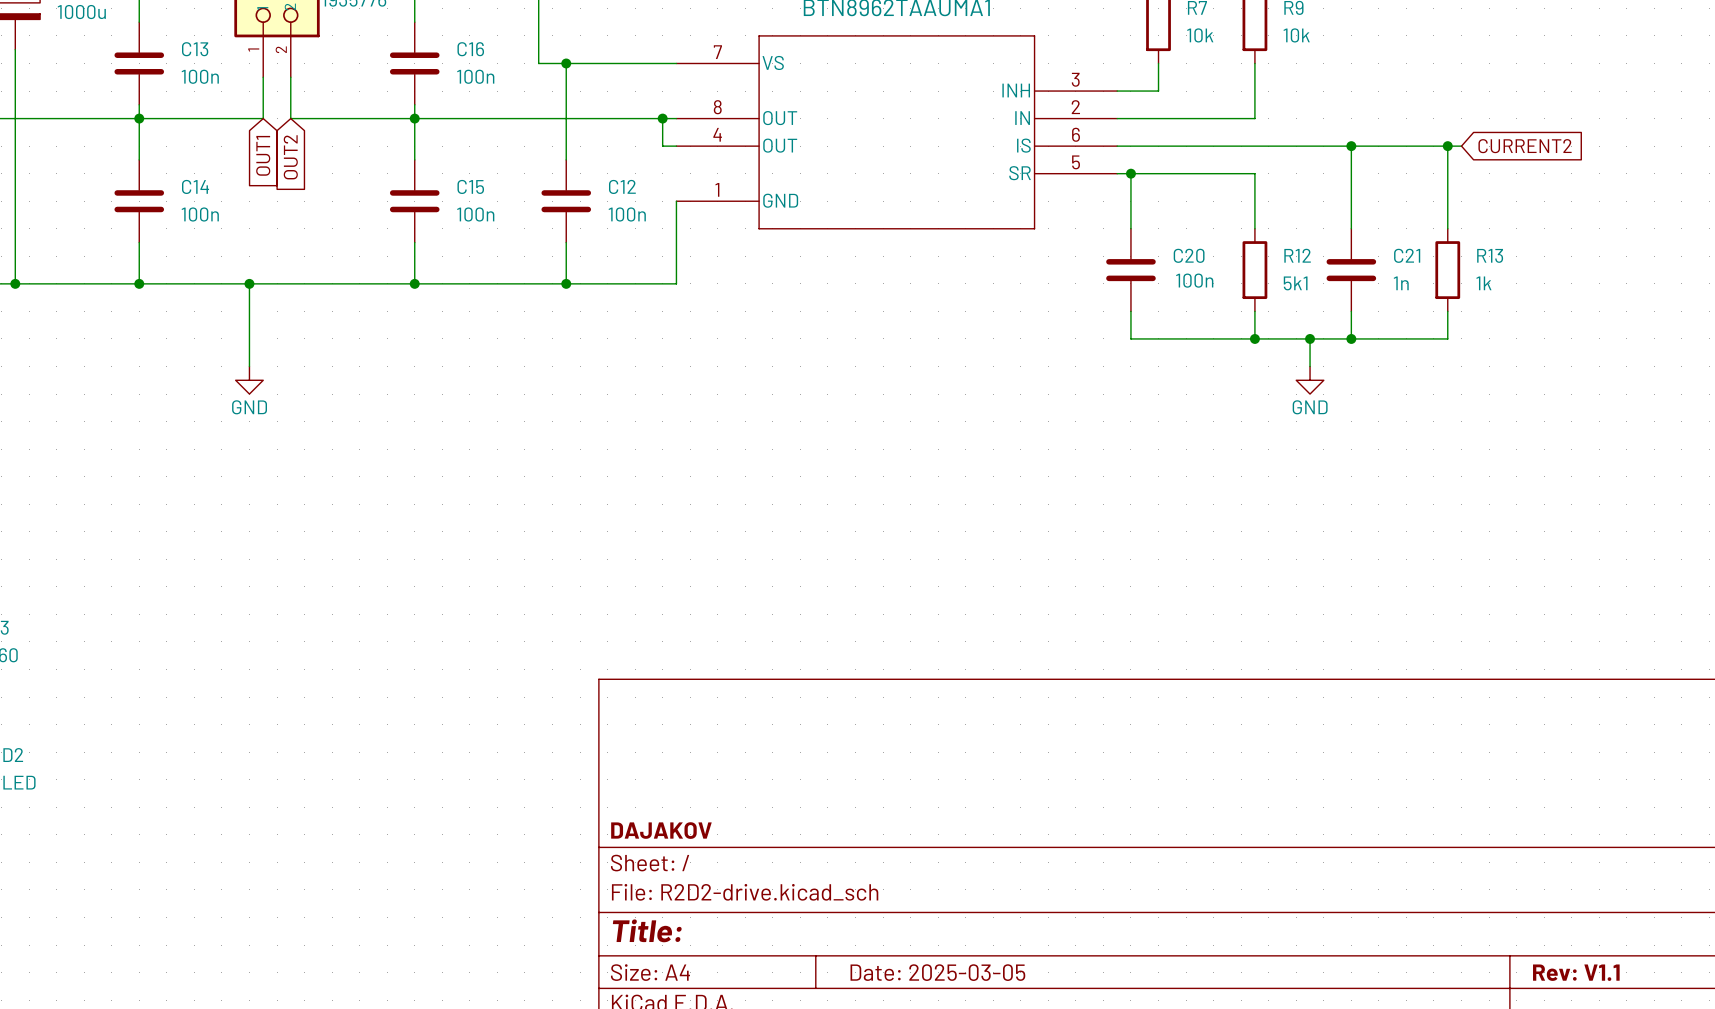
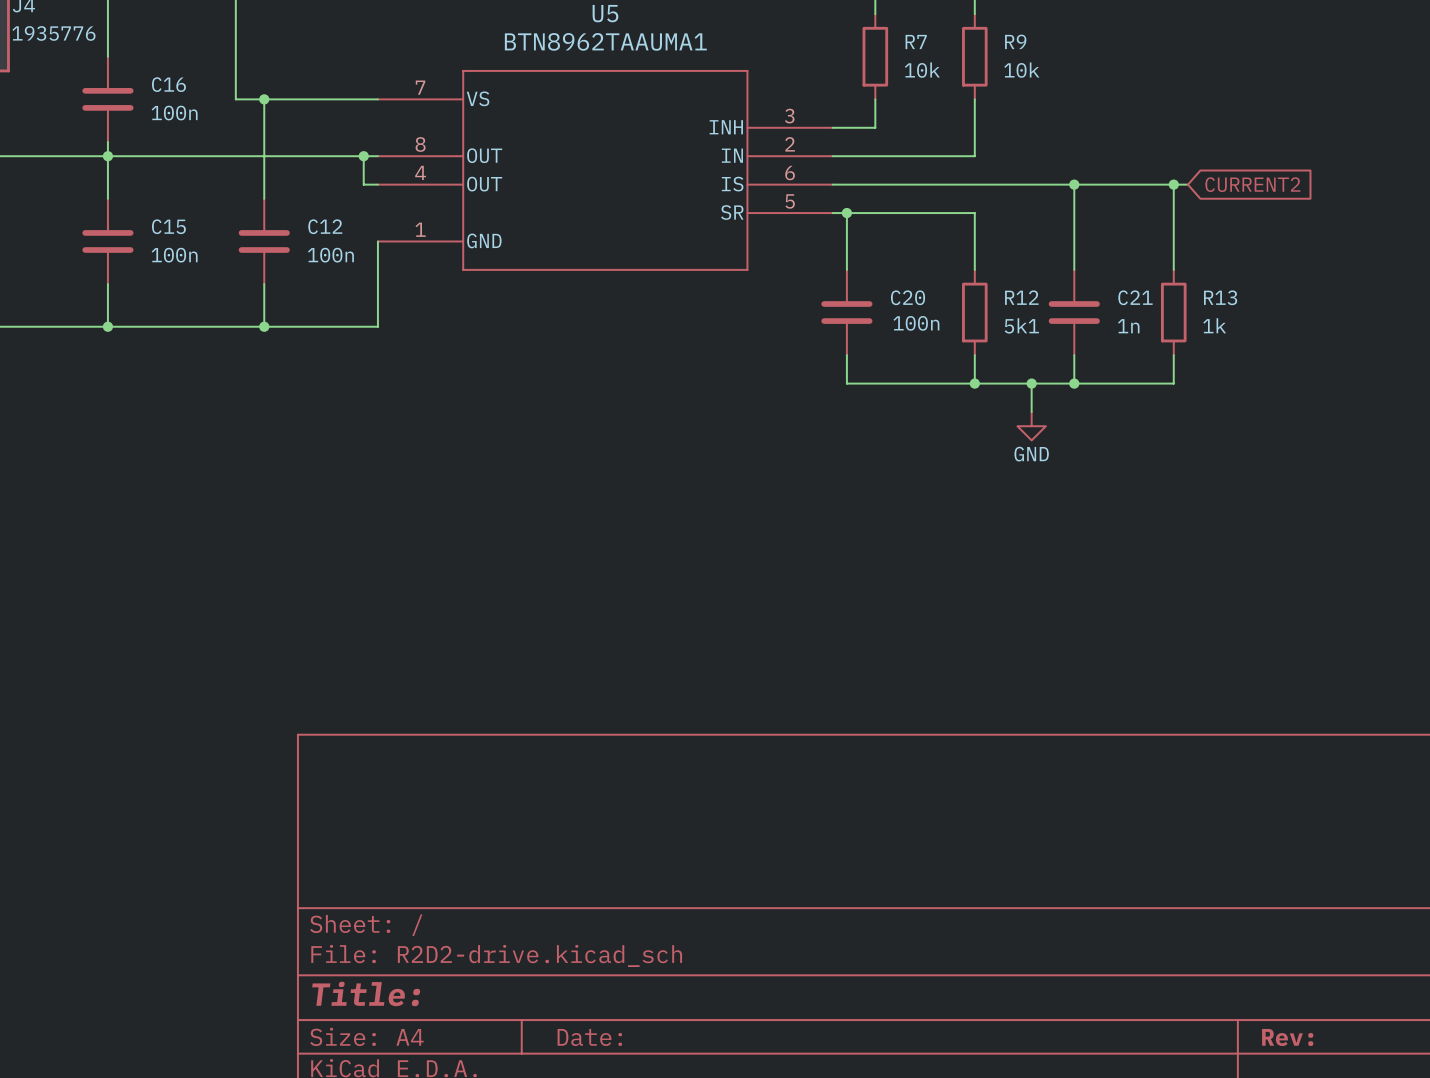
title block: DAJAKOV (661, 830) -> none
title block: Date: 2025-03-05 (937, 972) -> Date: (589, 1037)
title block: Rev: V1.1 (1576, 972) -> Rev: (1287, 1037)

